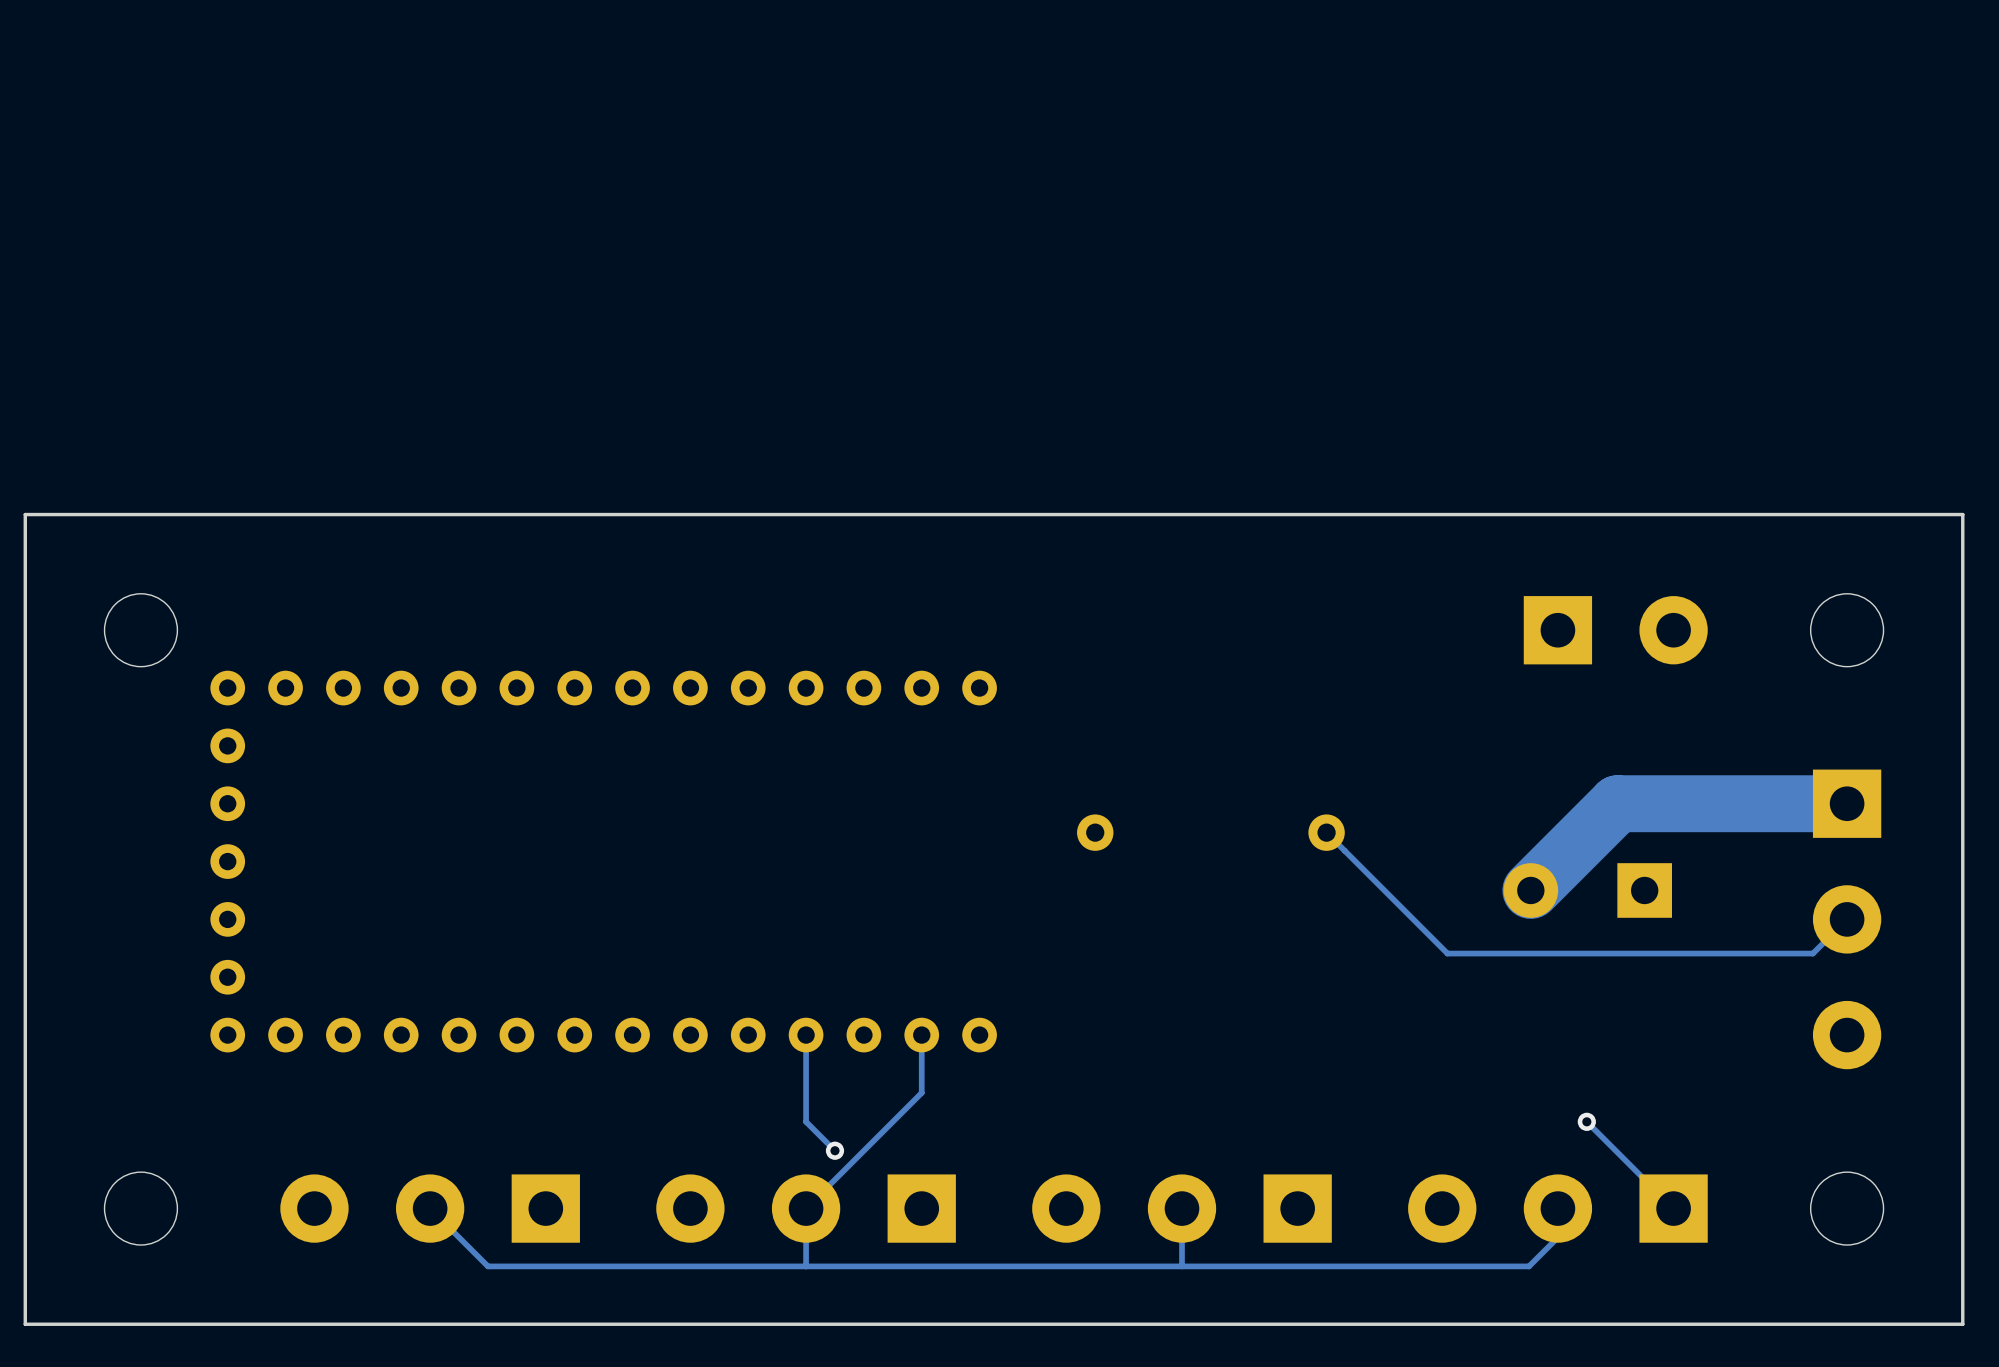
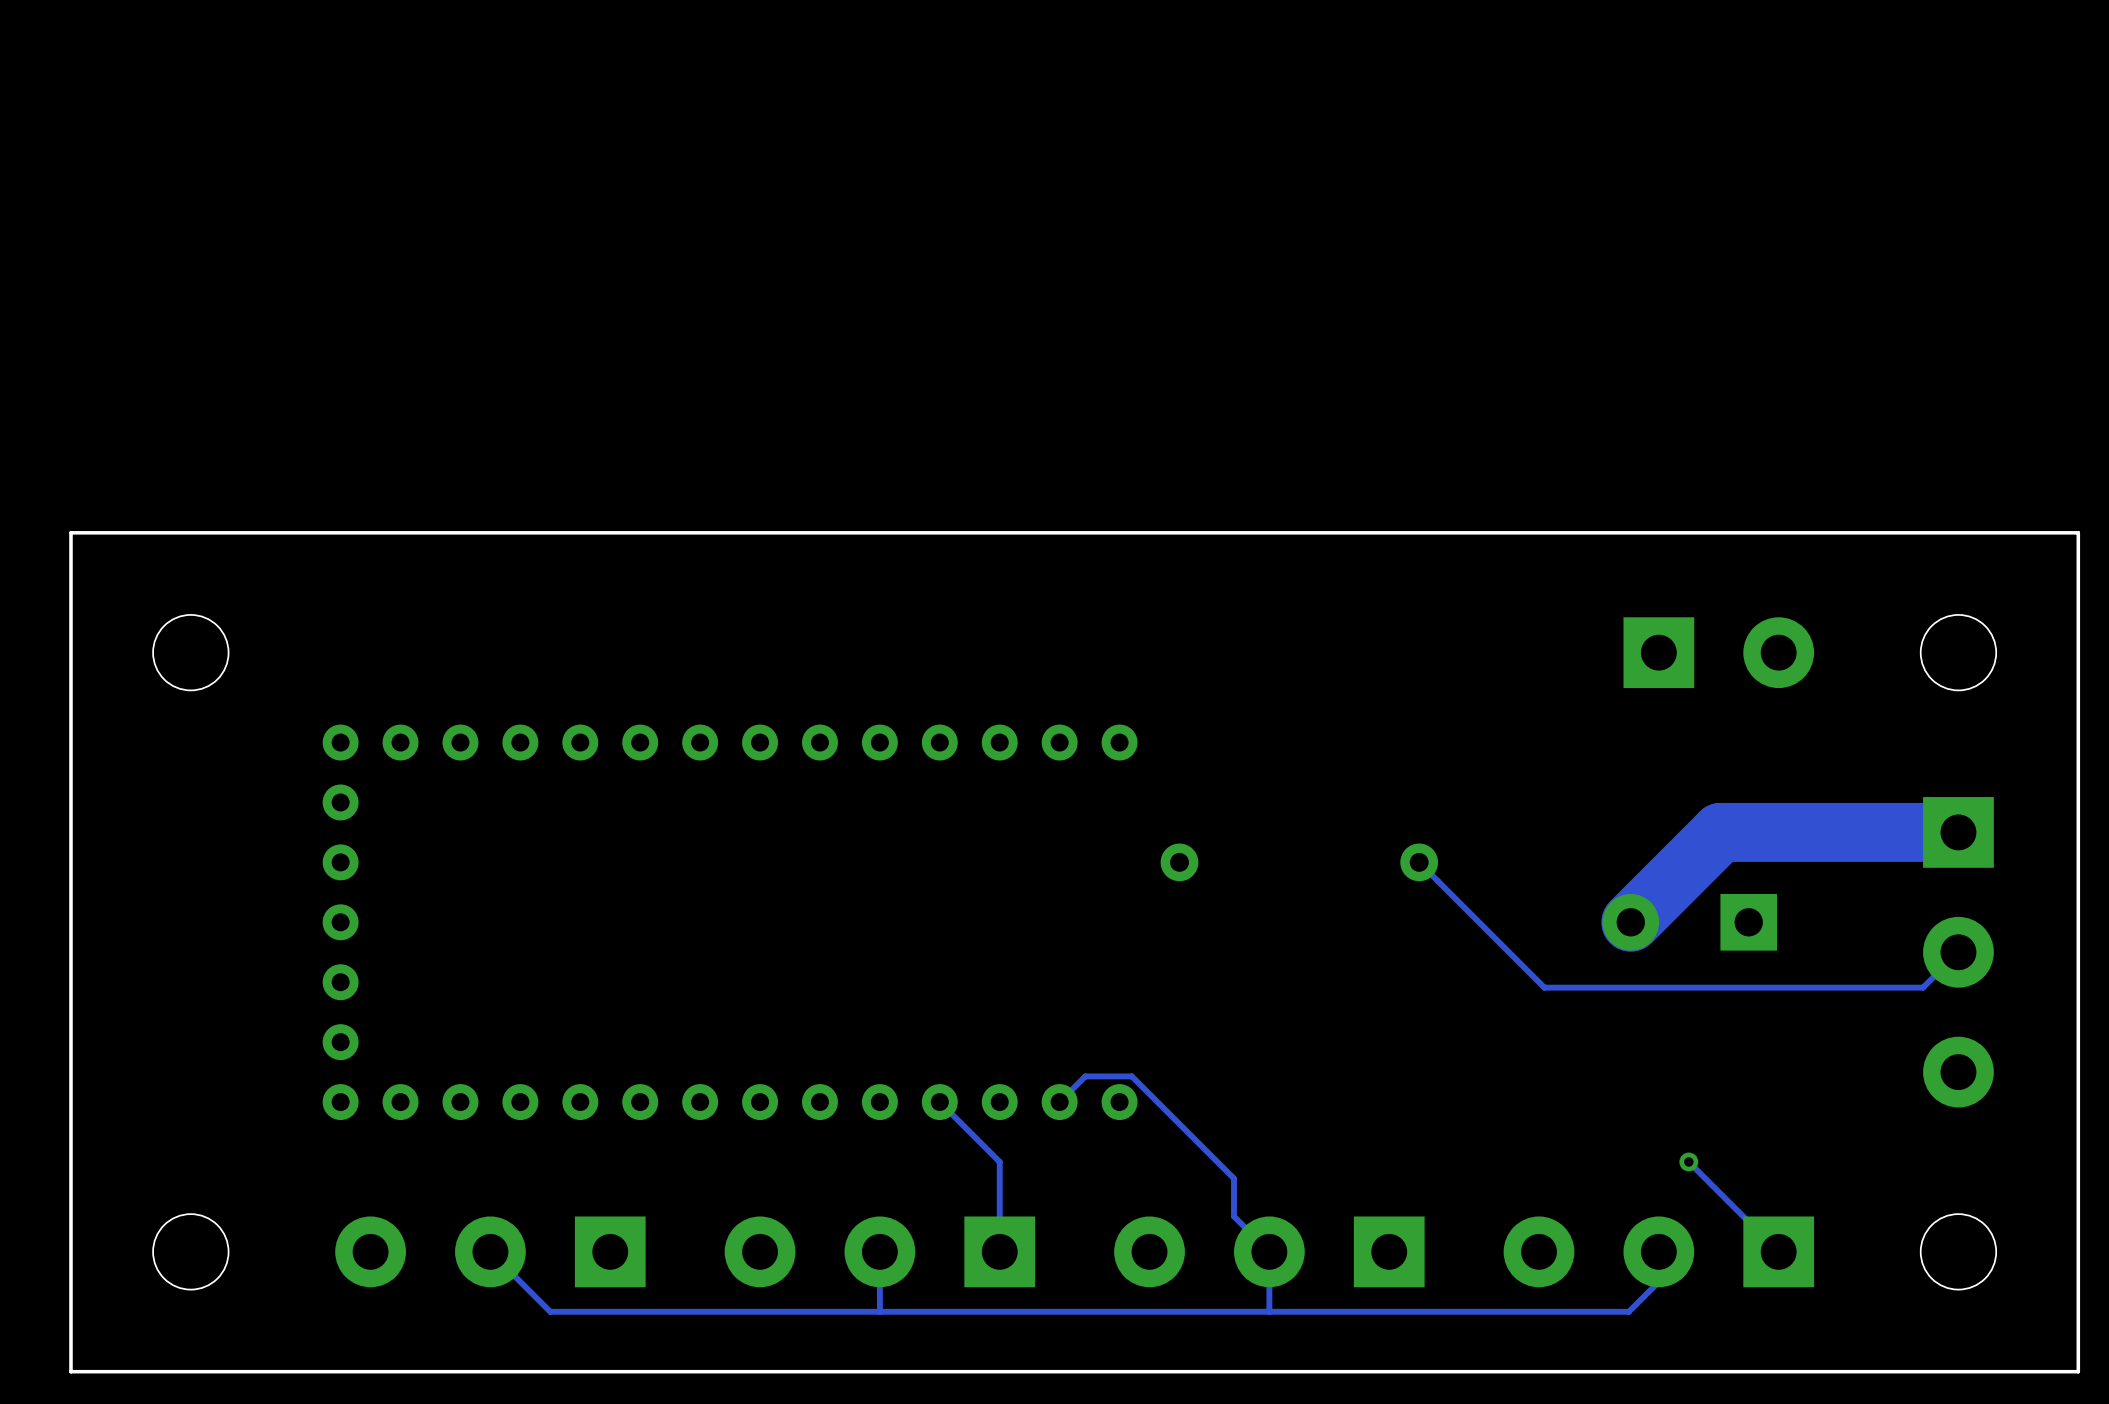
part position: (603, 861) -> (730, 922)
track: (806, 1035) (806, 1121) (834, 1150) -> none
track: (921, 1035) (921, 1092) (806, 1208) -> none
track: none -> (939, 1102) (999, 1161) (999, 1251)
track: none -> (1059, 1102) (1085, 1076) (1131, 1076) (1233, 1178) (1233, 1216) (1269, 1251)
via: (834, 1150) -> none

